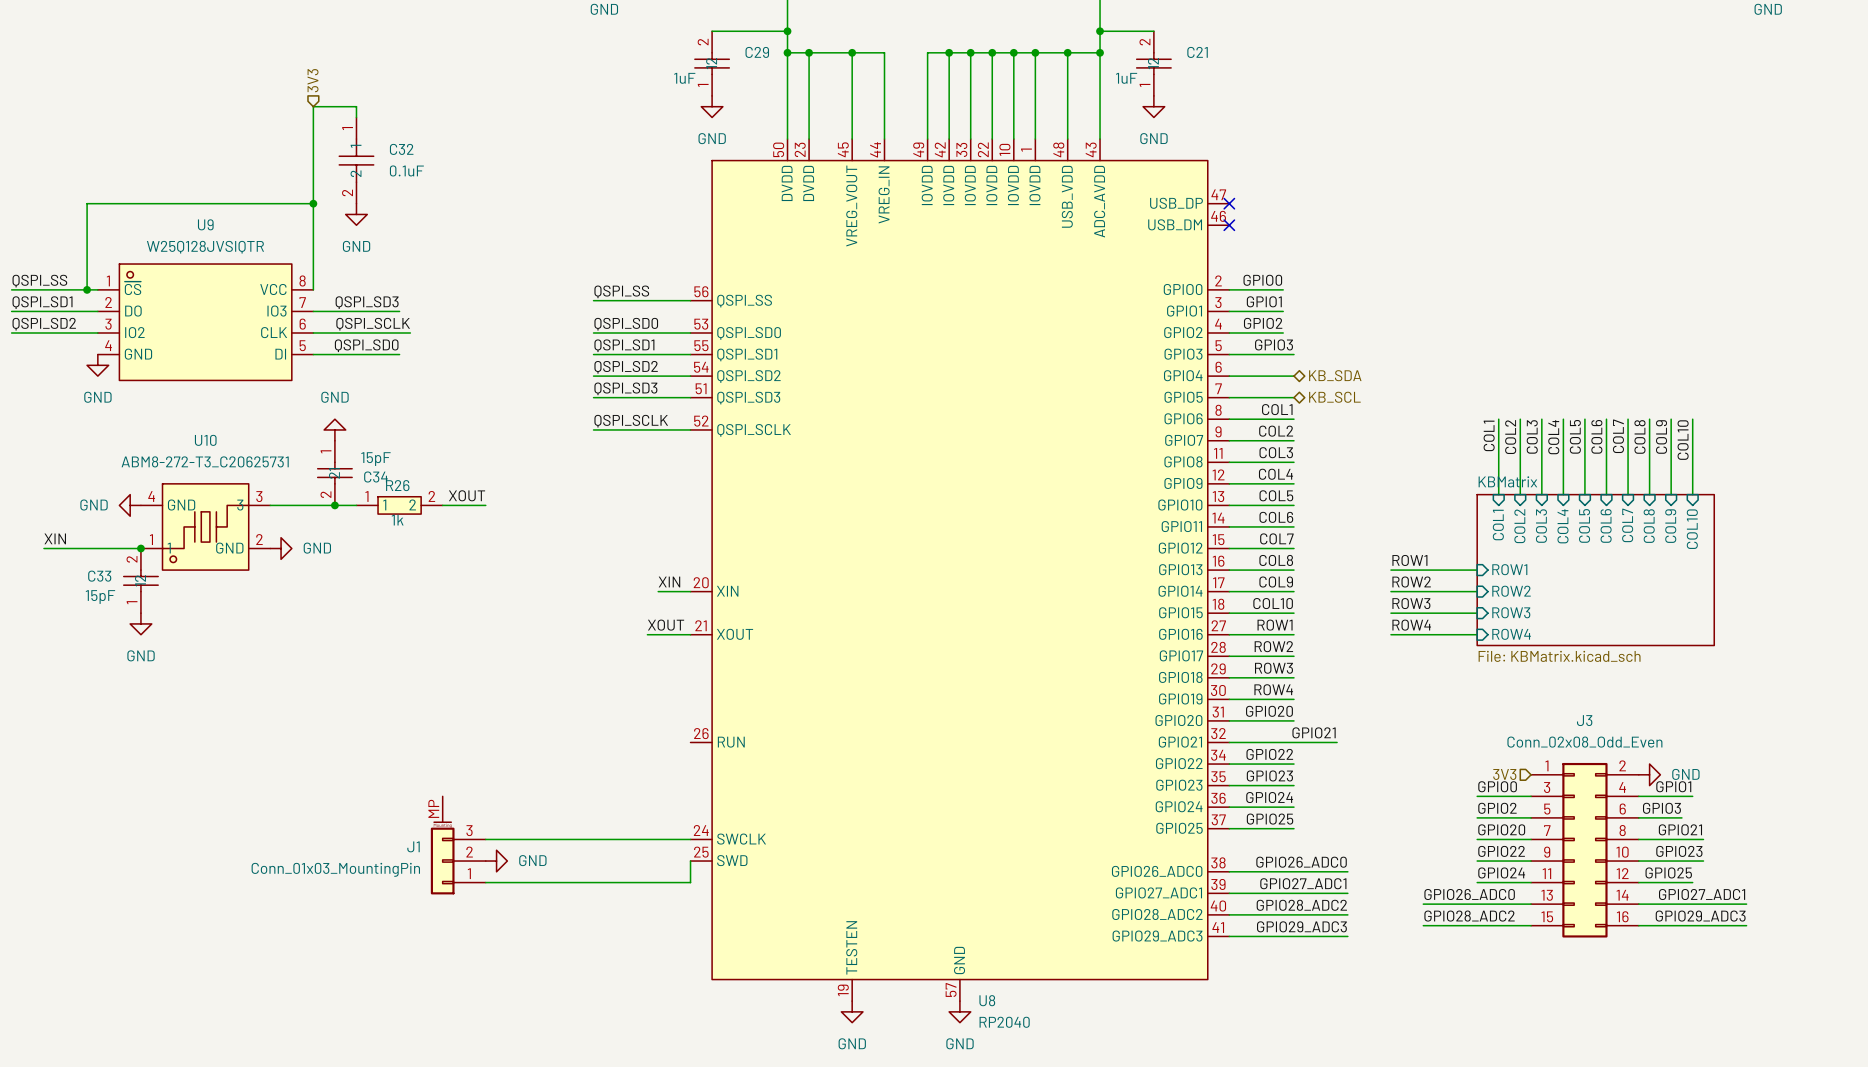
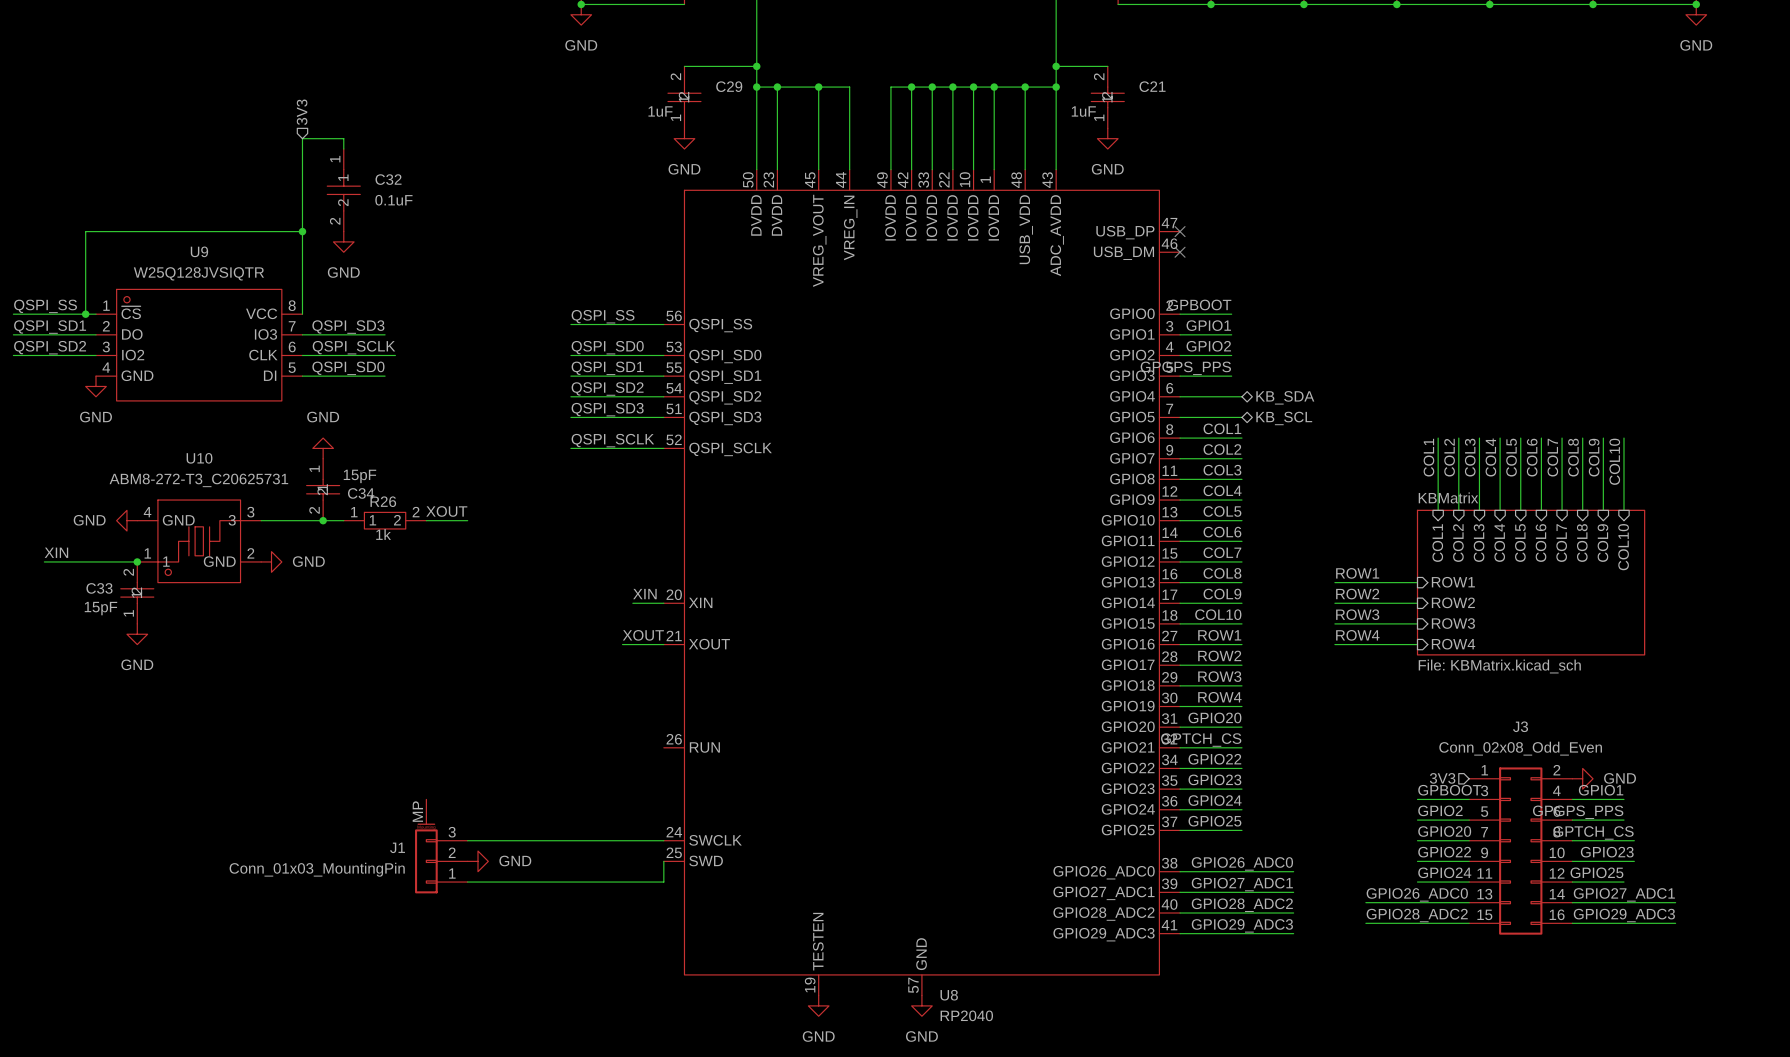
label: GPIO0 (1262, 280) -> GPBOOT (1199, 304)
label: none -> GPGPS_PPS (1185, 368)
label: GPIO3 (1274, 344) -> none
wire: (1283, 354) (1293, 354) -> none
label: none -> GPTCH_CS (1201, 740)
label: GPIO21 (1314, 732) -> none
wire: (1293, 742) (1337, 742) -> none
label: GPIO0 (1497, 786) -> GPBOOT (1449, 790)
label: none -> GPGPS_PPS (1578, 812)
label: GPIO3 (1661, 808) -> none
wire: none -> (1613, 820) (1623, 820)
label: GPIO21 (1680, 829) -> GPTCH_CS (1593, 832)

